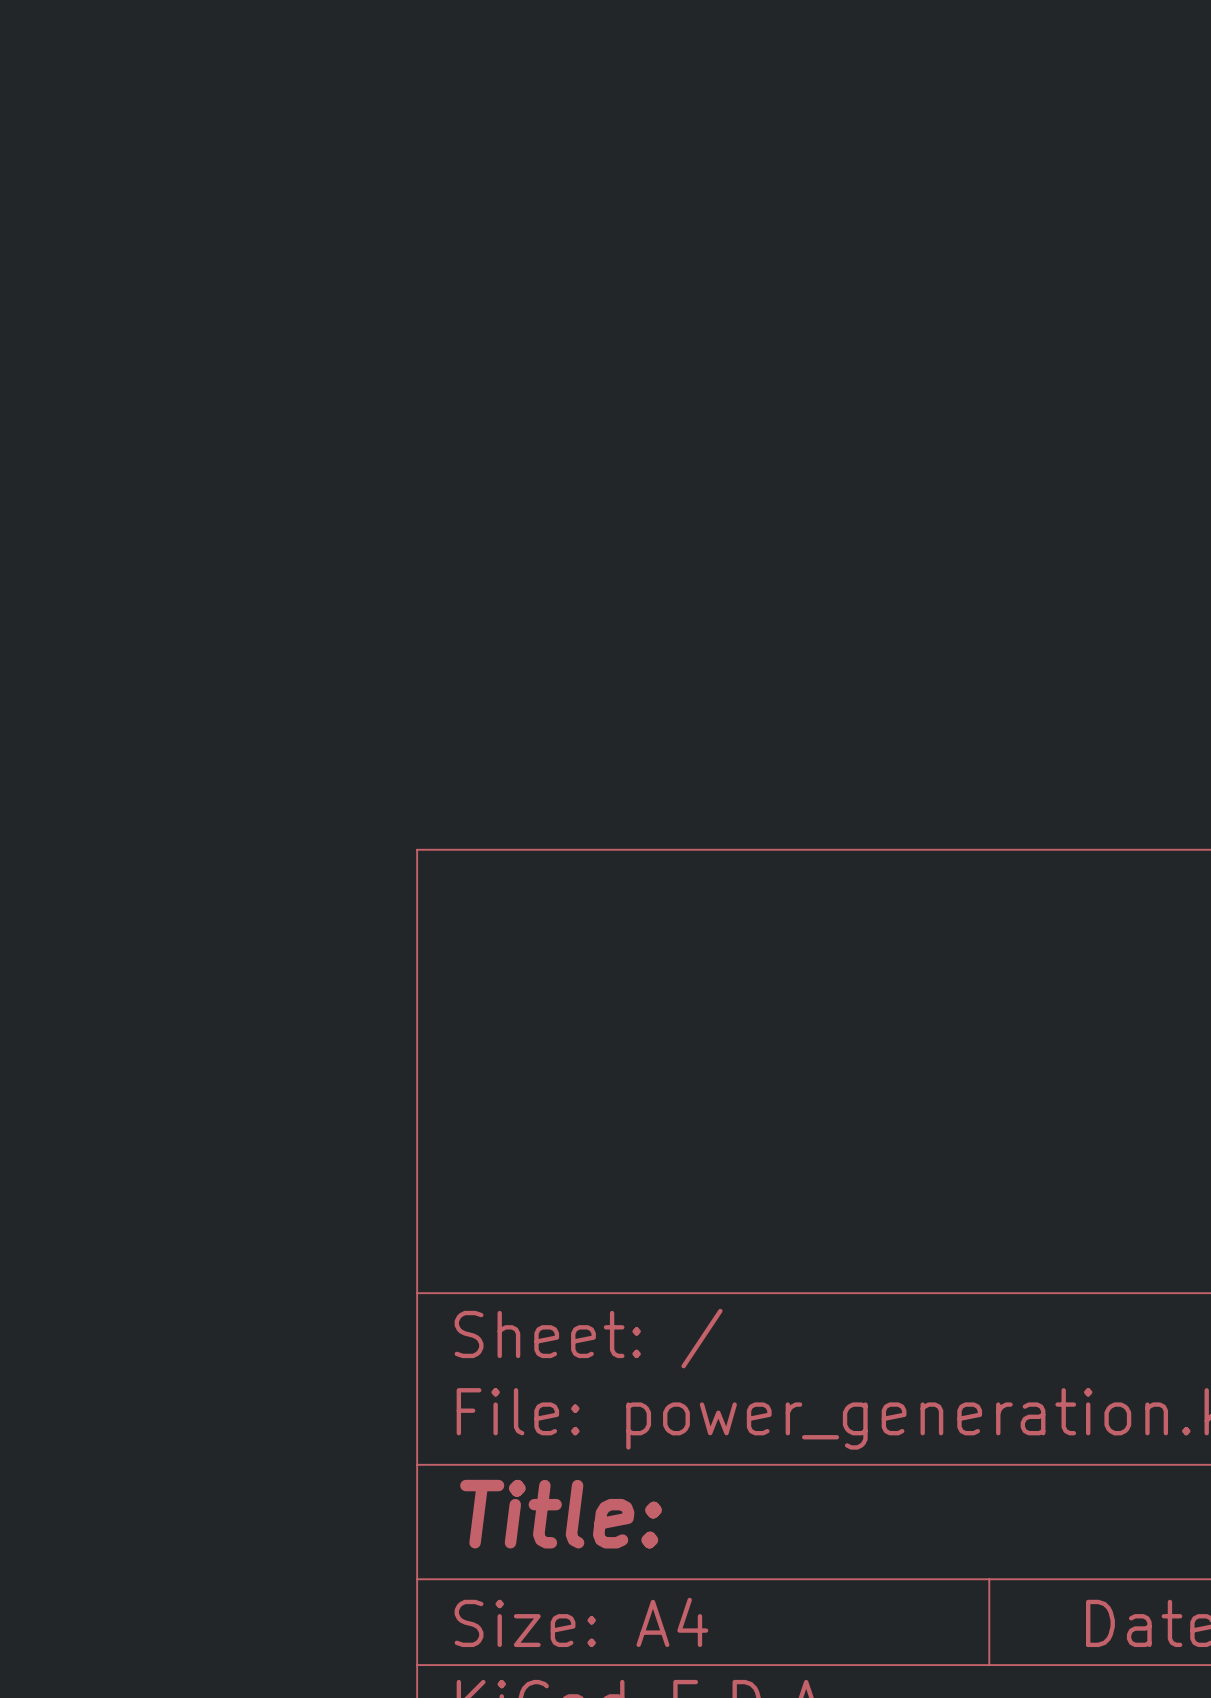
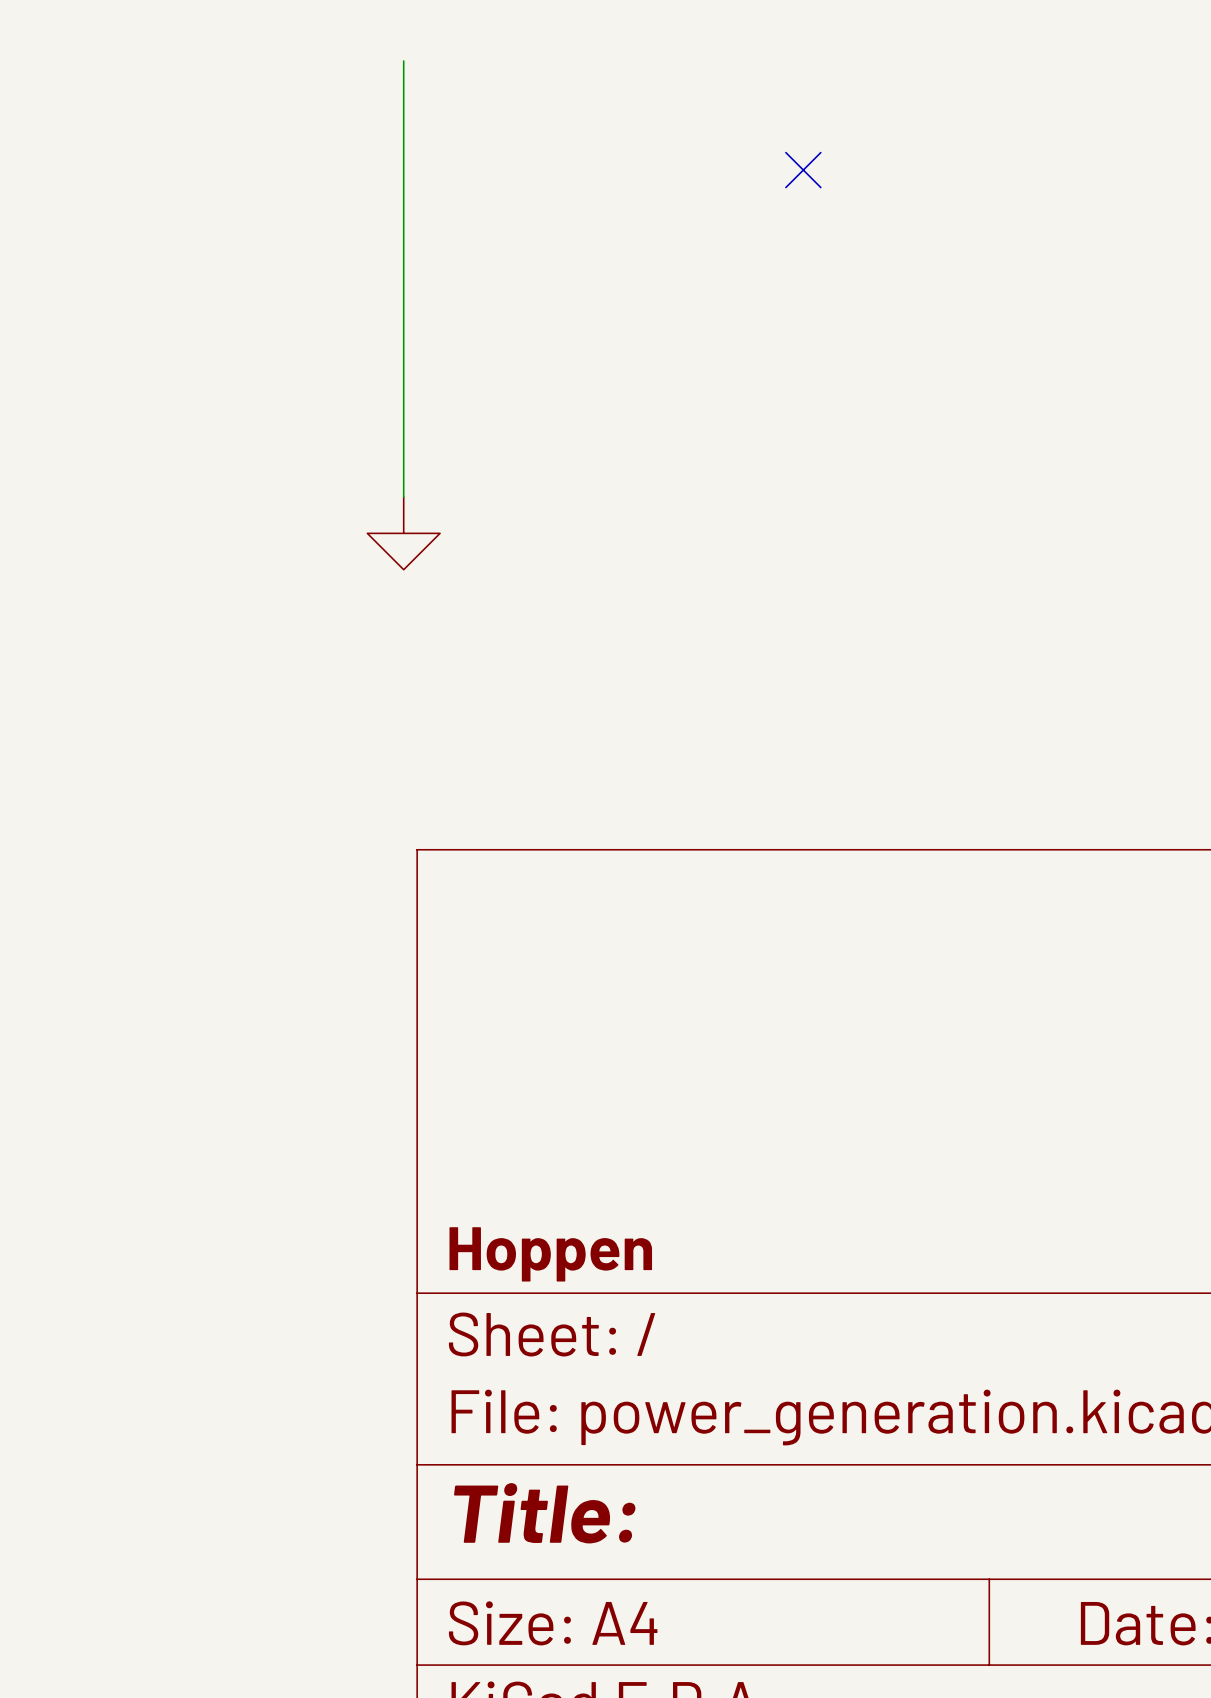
wire: none -> (403, 61) (403, 497)
no-connect mark: none -> (803, 170)
power symbol: none -> (403, 533)
title block: none -> Hoppen (550, 1254)

